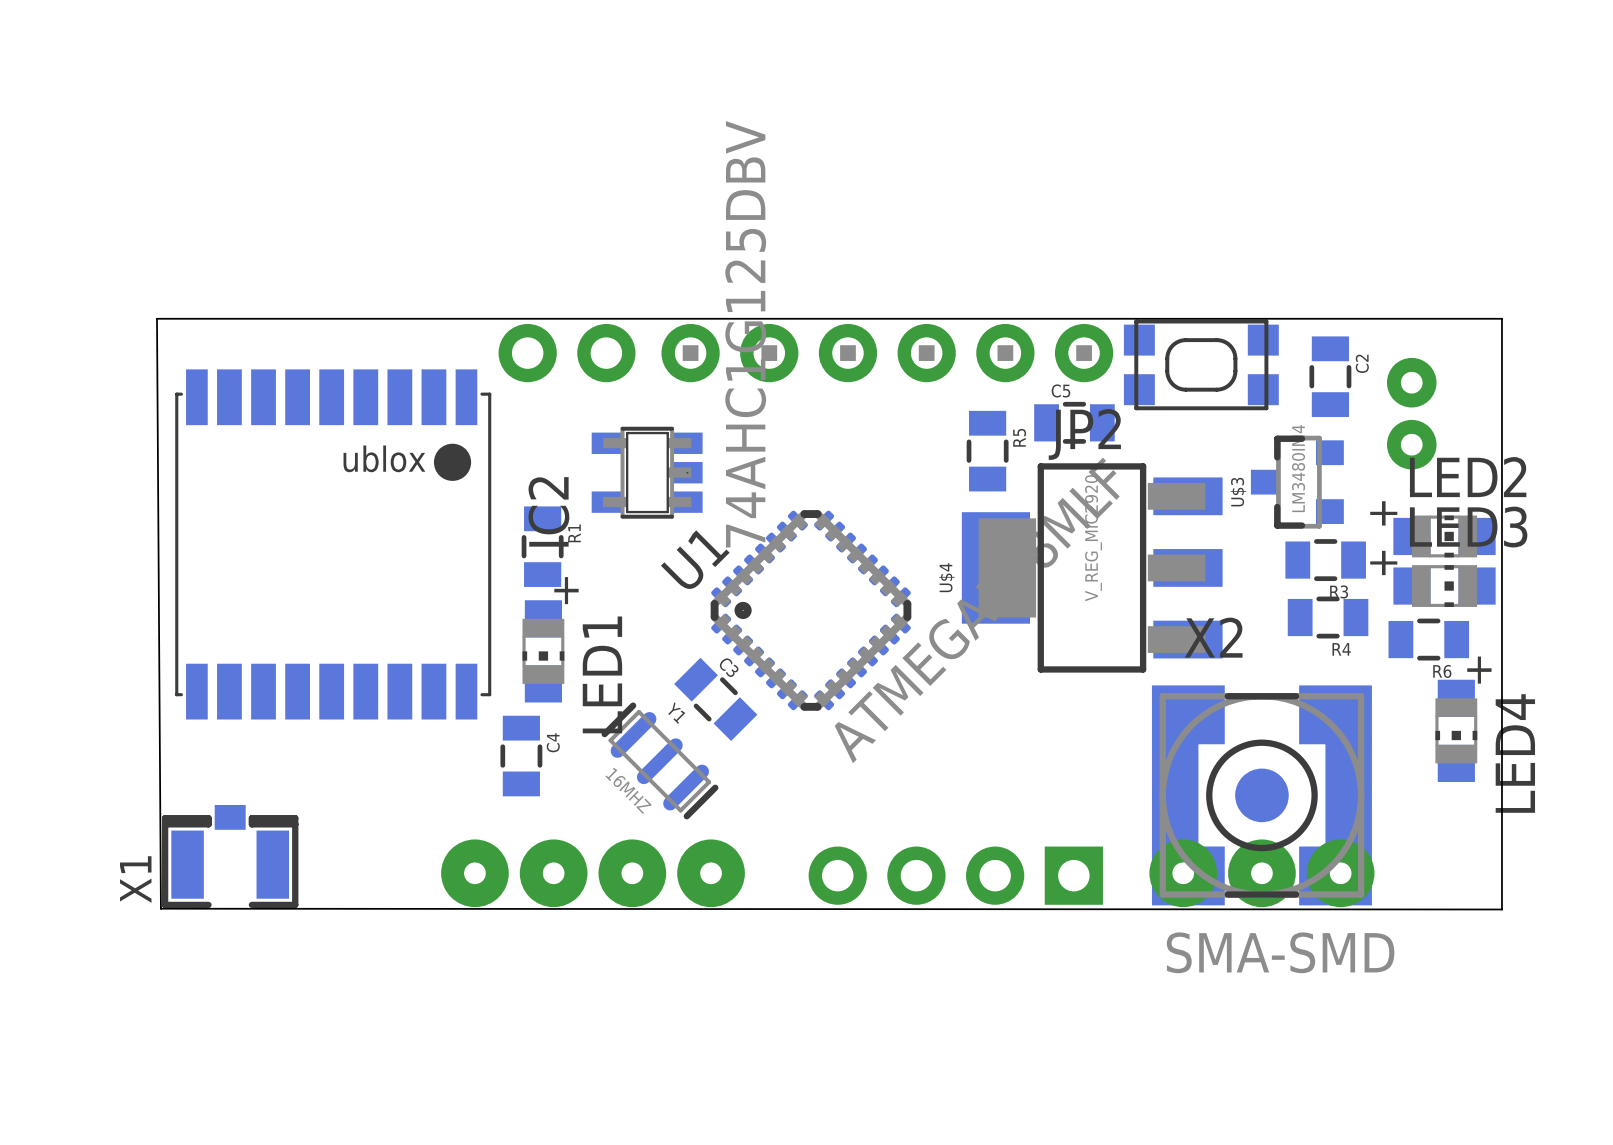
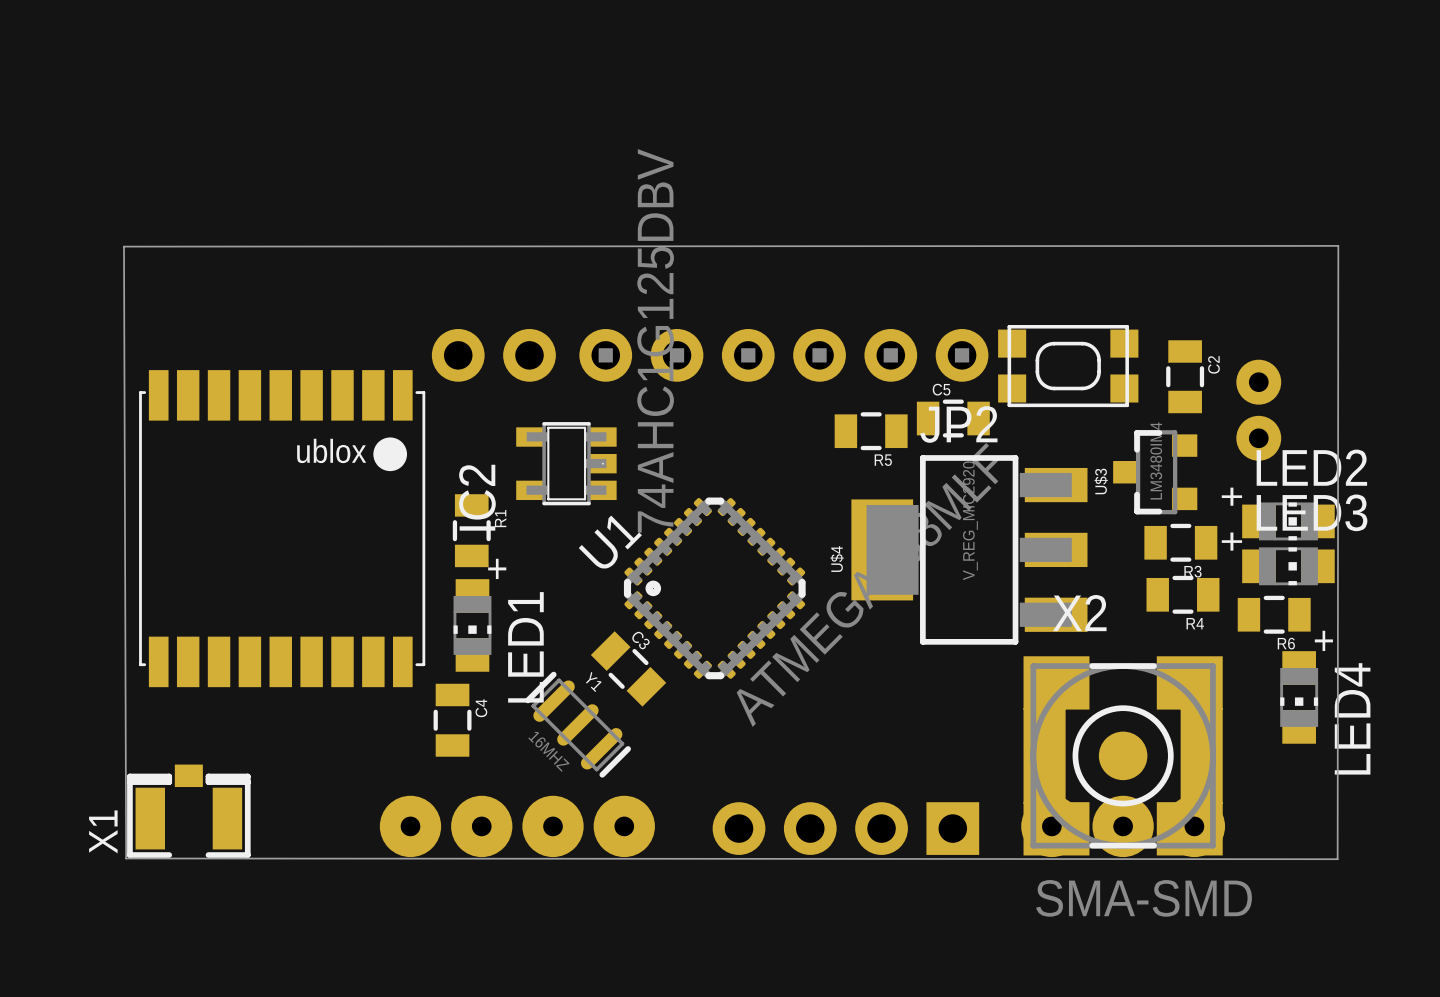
R5 rotation: 0° (987, 451) -> 90° clockwise (871, 431)
board edge: (160, 908) (156, 318) (1501, 318) (1501, 909) (1498, 909) -> (126, 858) (124, 246) (1338, 245) (1337, 859)

